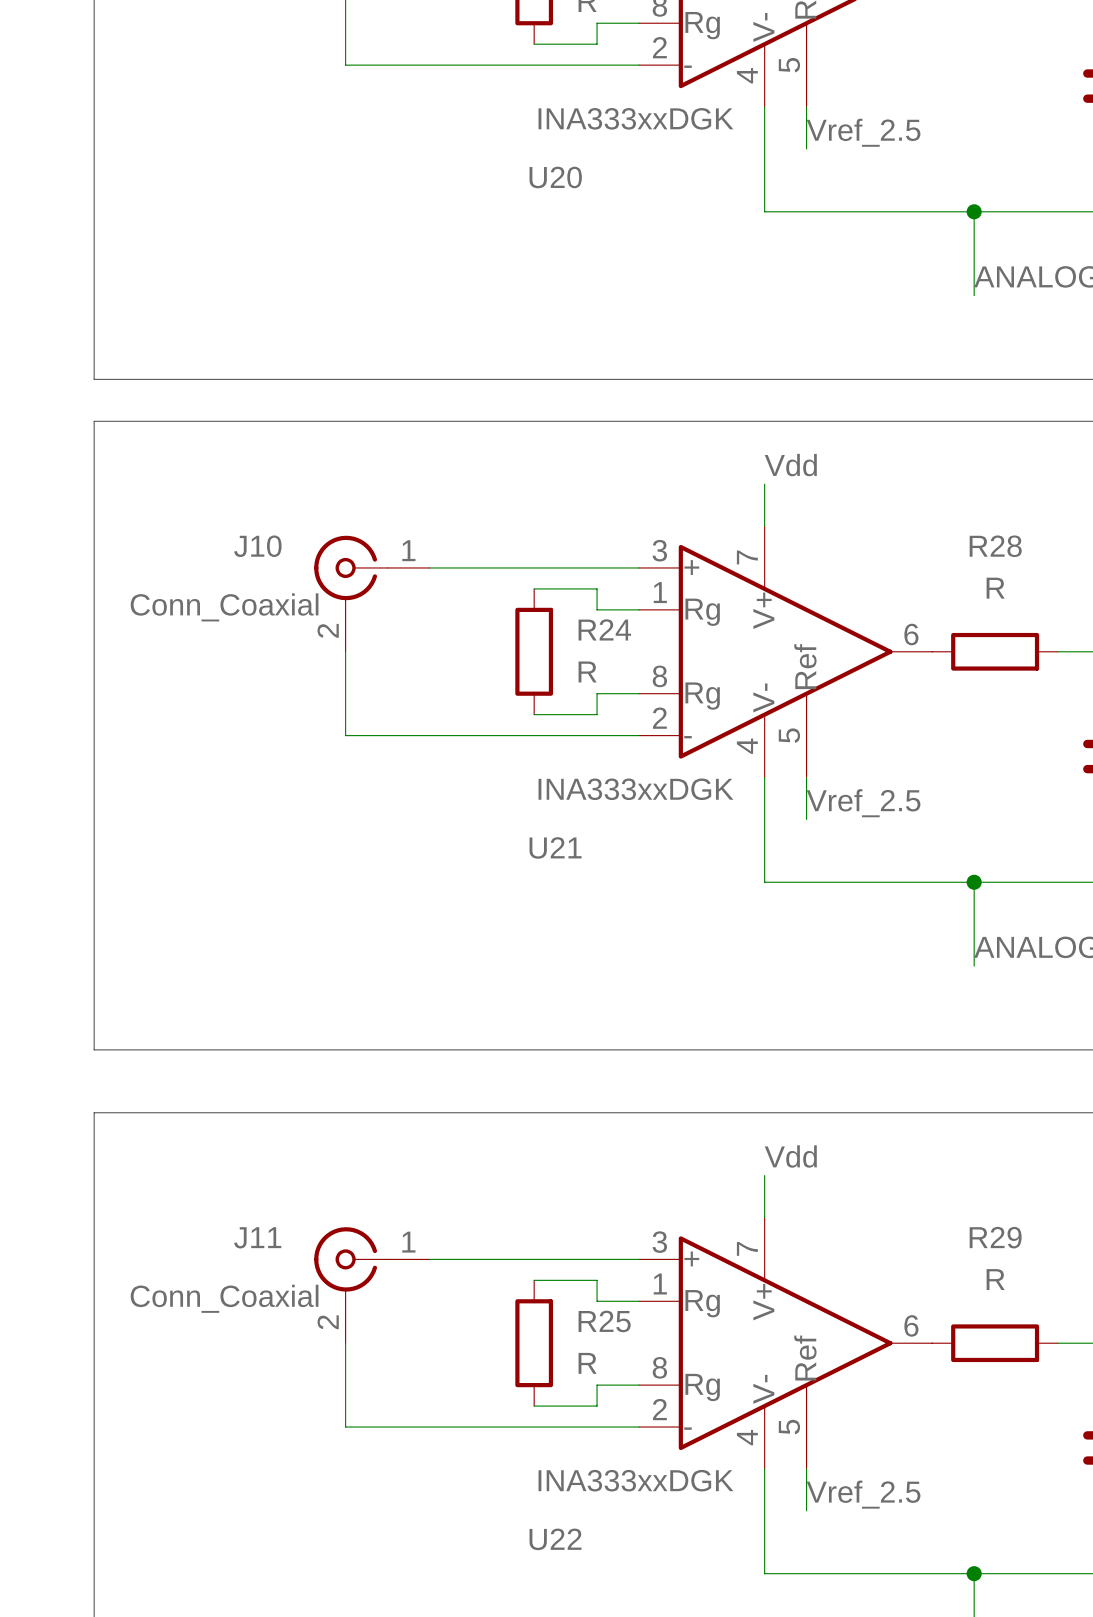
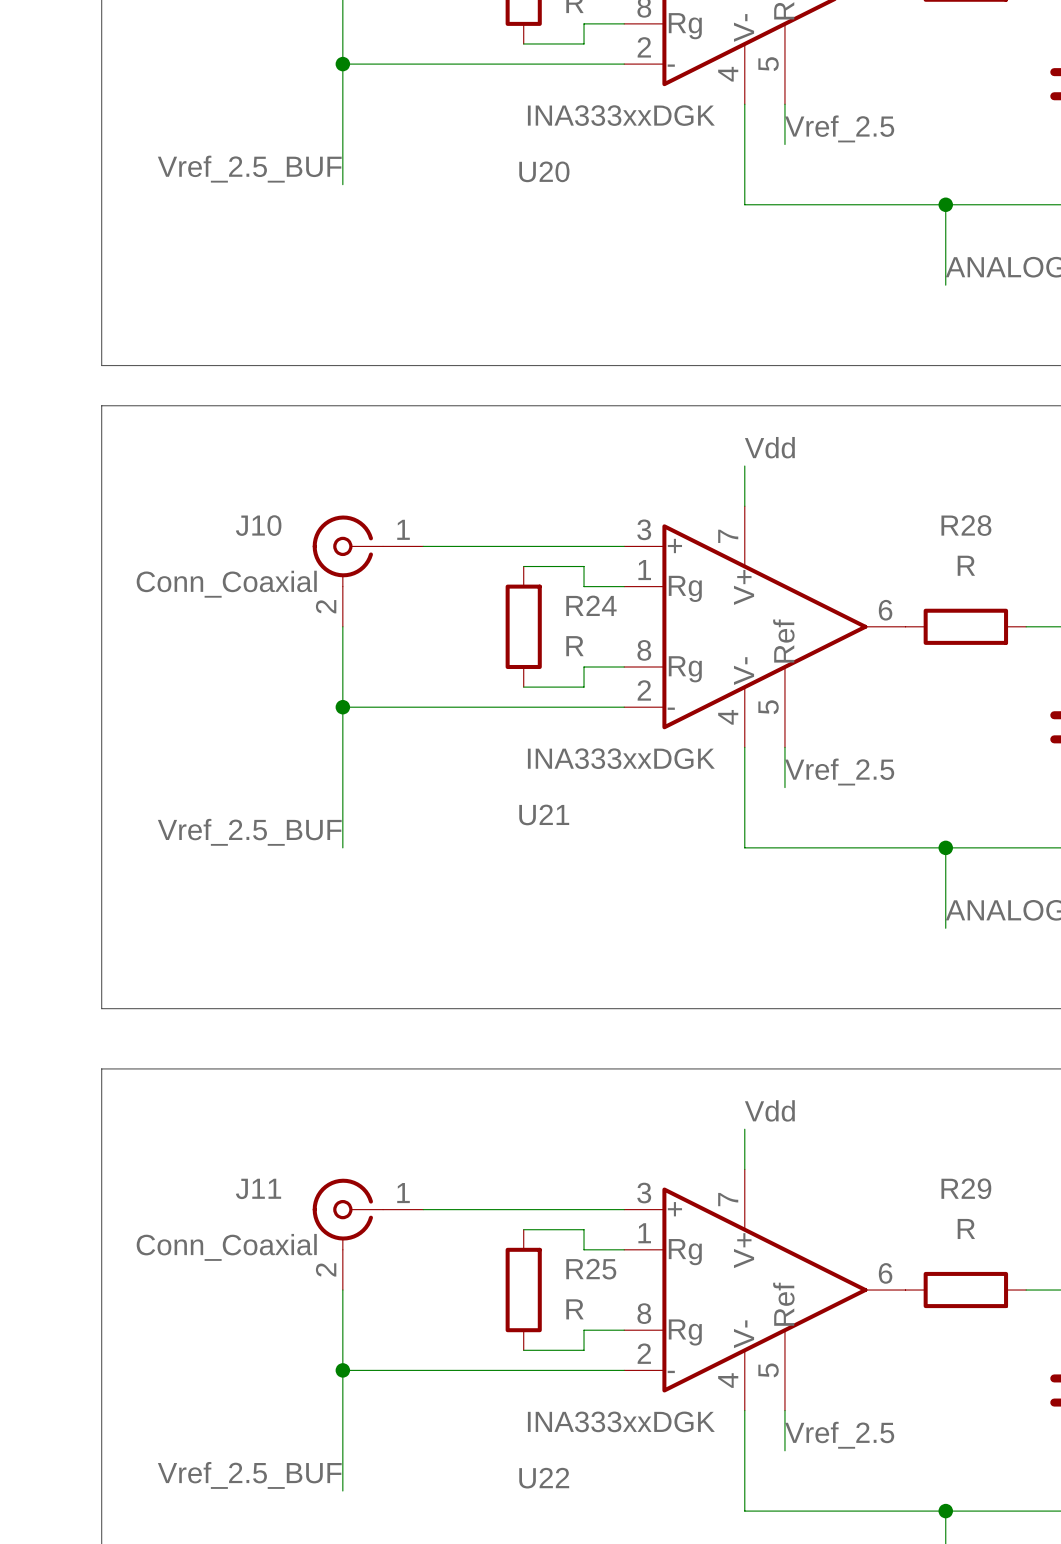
wire: none -> (342, 64) (342, 184)
junction: none -> (342, 64)
label: none -> Vref_2.5_BUF (249, 169)
wire: none -> (342, 707) (342, 847)
junction: none -> (342, 707)
label: none -> Vref_2.5_BUF (249, 832)
wire: none -> (342, 1370) (342, 1490)
junction: none -> (342, 1370)
label: none -> Vref_2.5_BUF (249, 1475)

